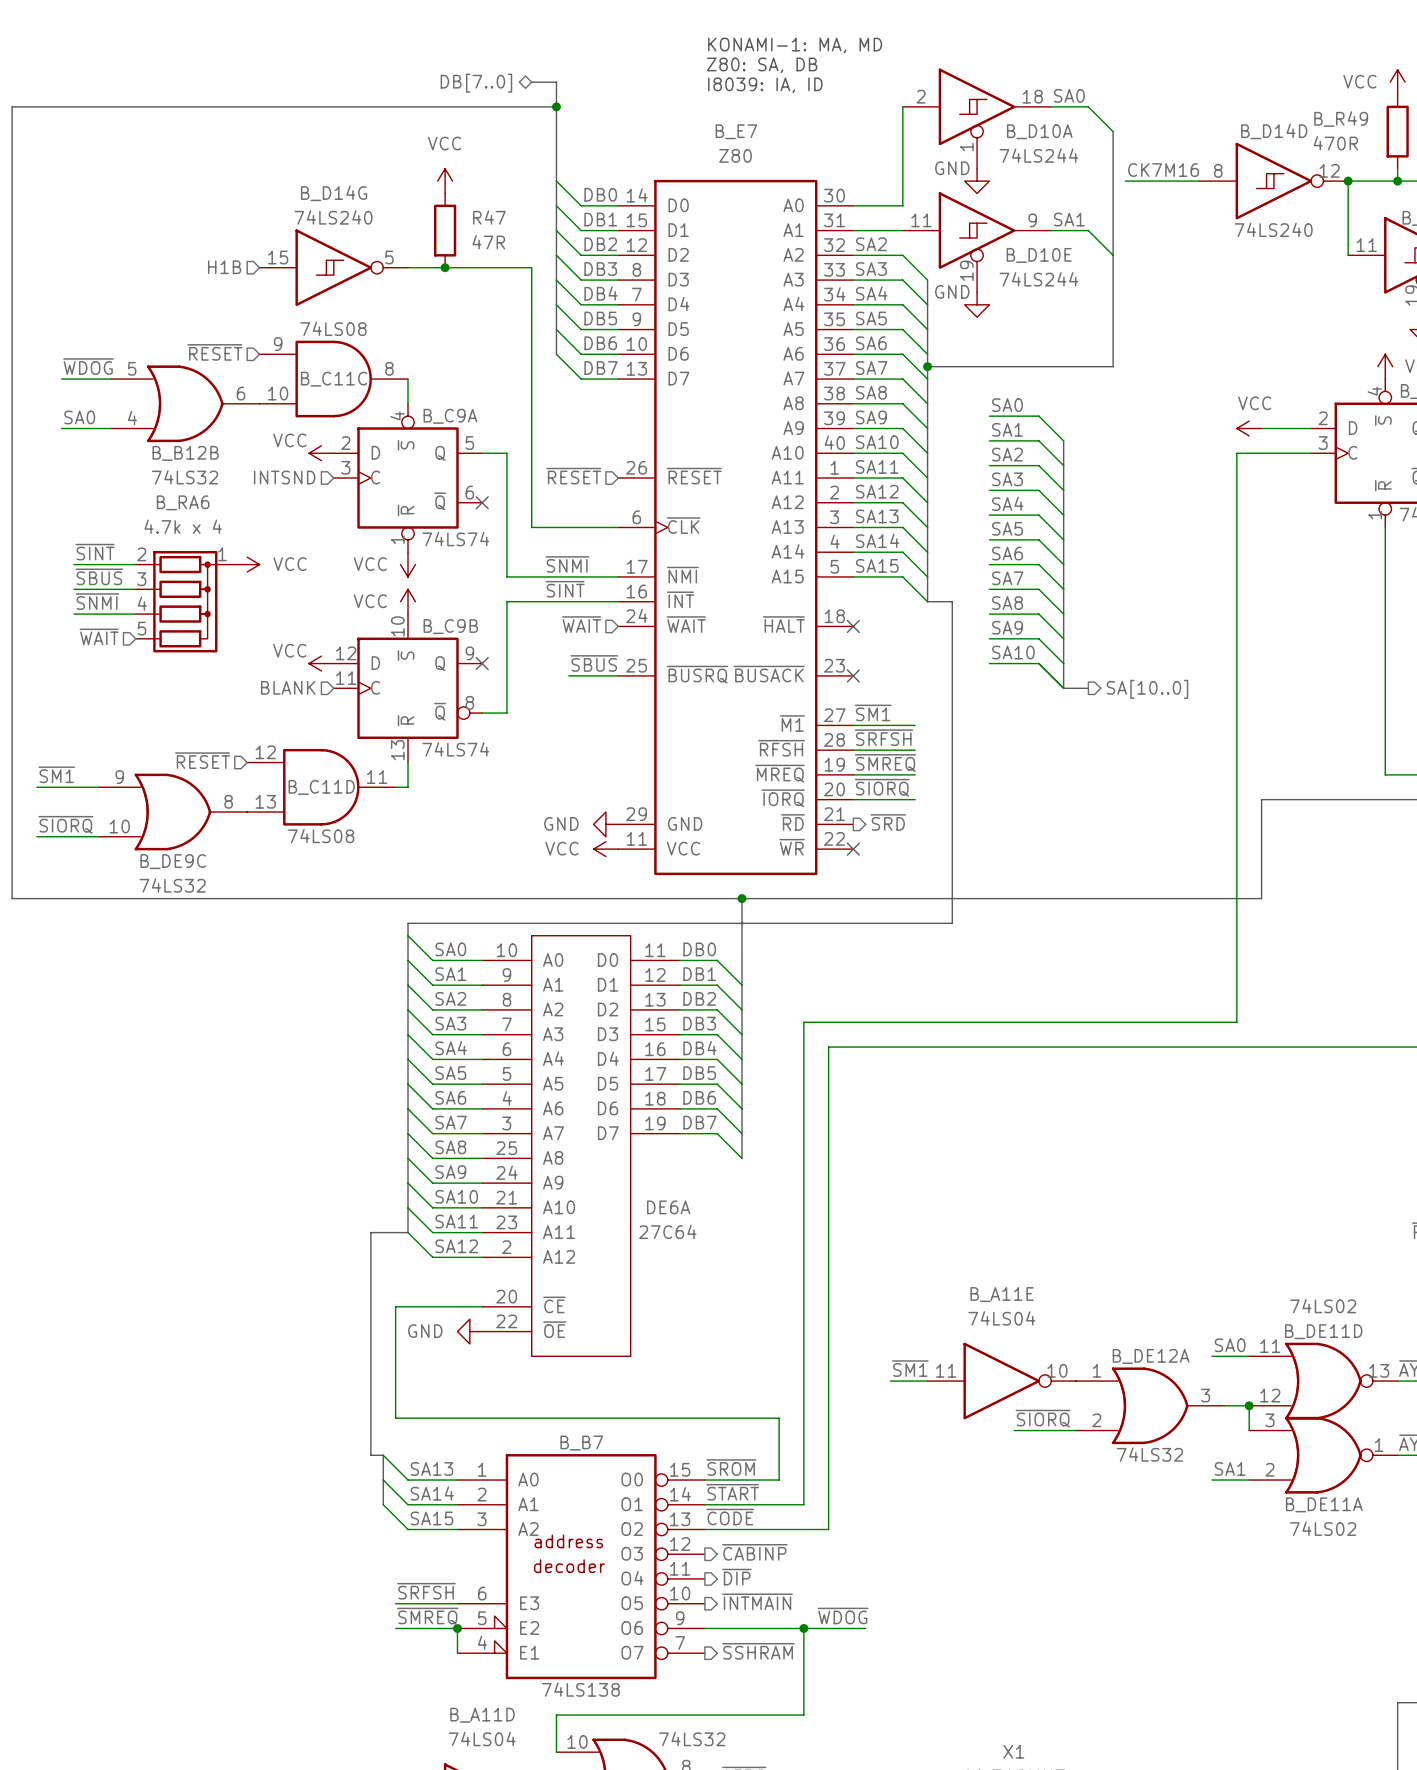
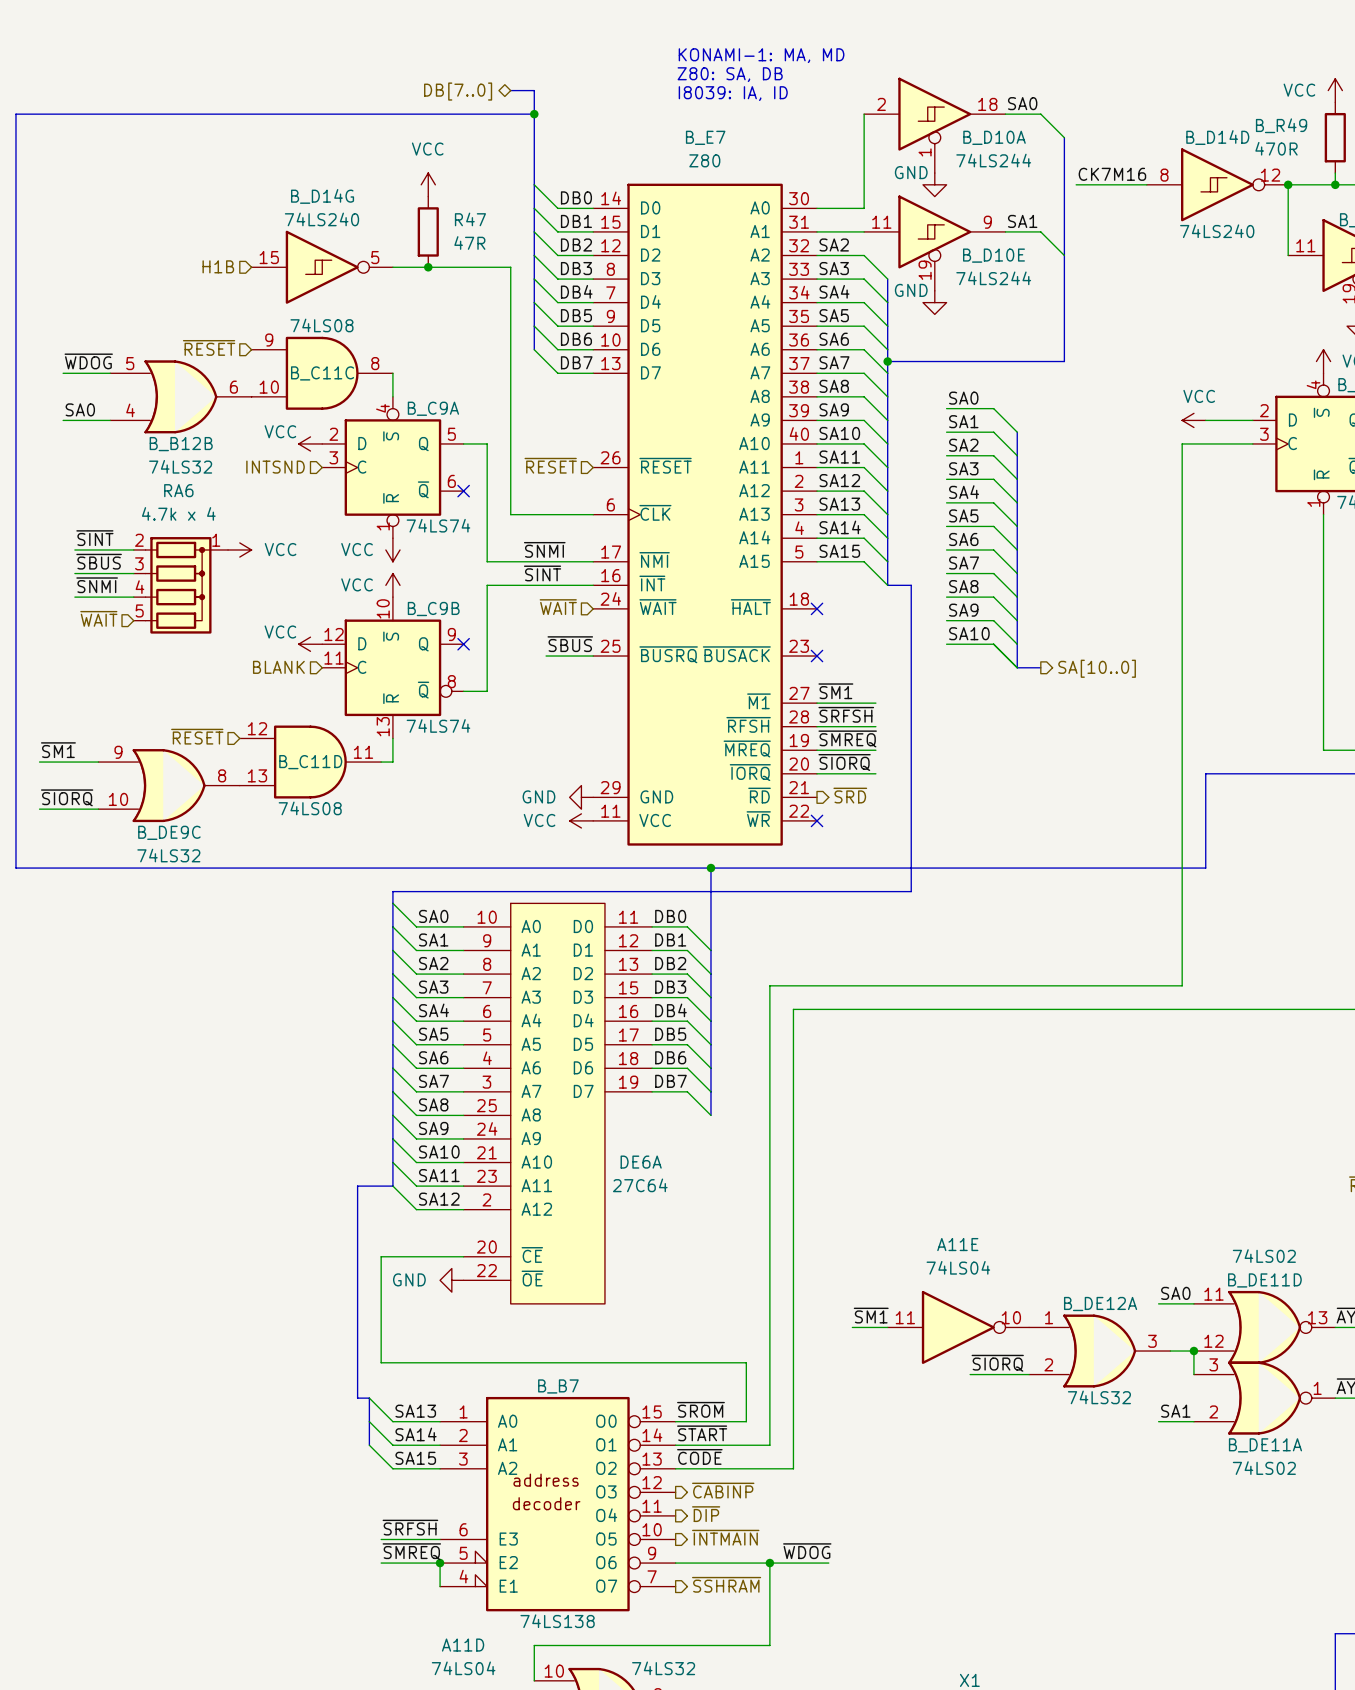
B_RA6 name: B_RA6 (183, 502) -> RA6 (178, 490)
B_A11E name: B_A11E (1002, 1294) -> A11E (957, 1244)
B_A11D name: B_A11D (482, 1715) -> A11D (463, 1645)

